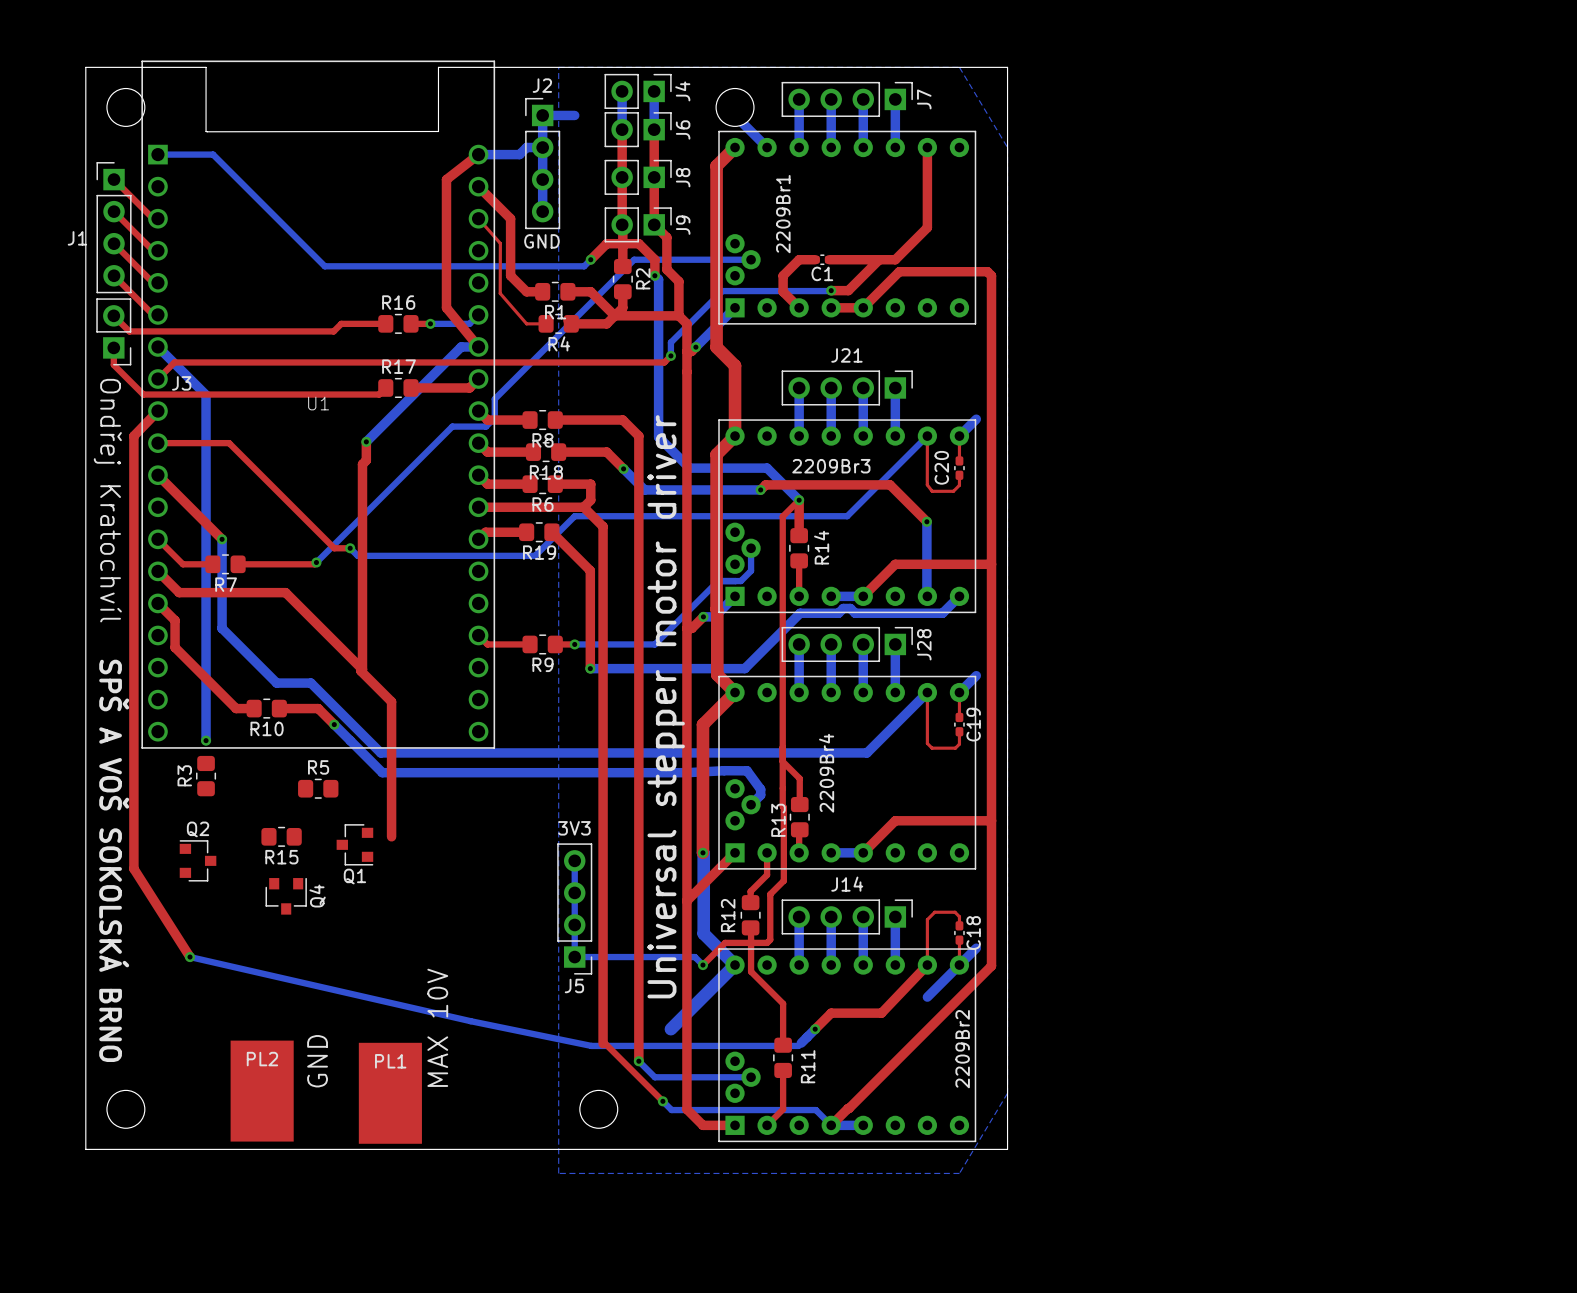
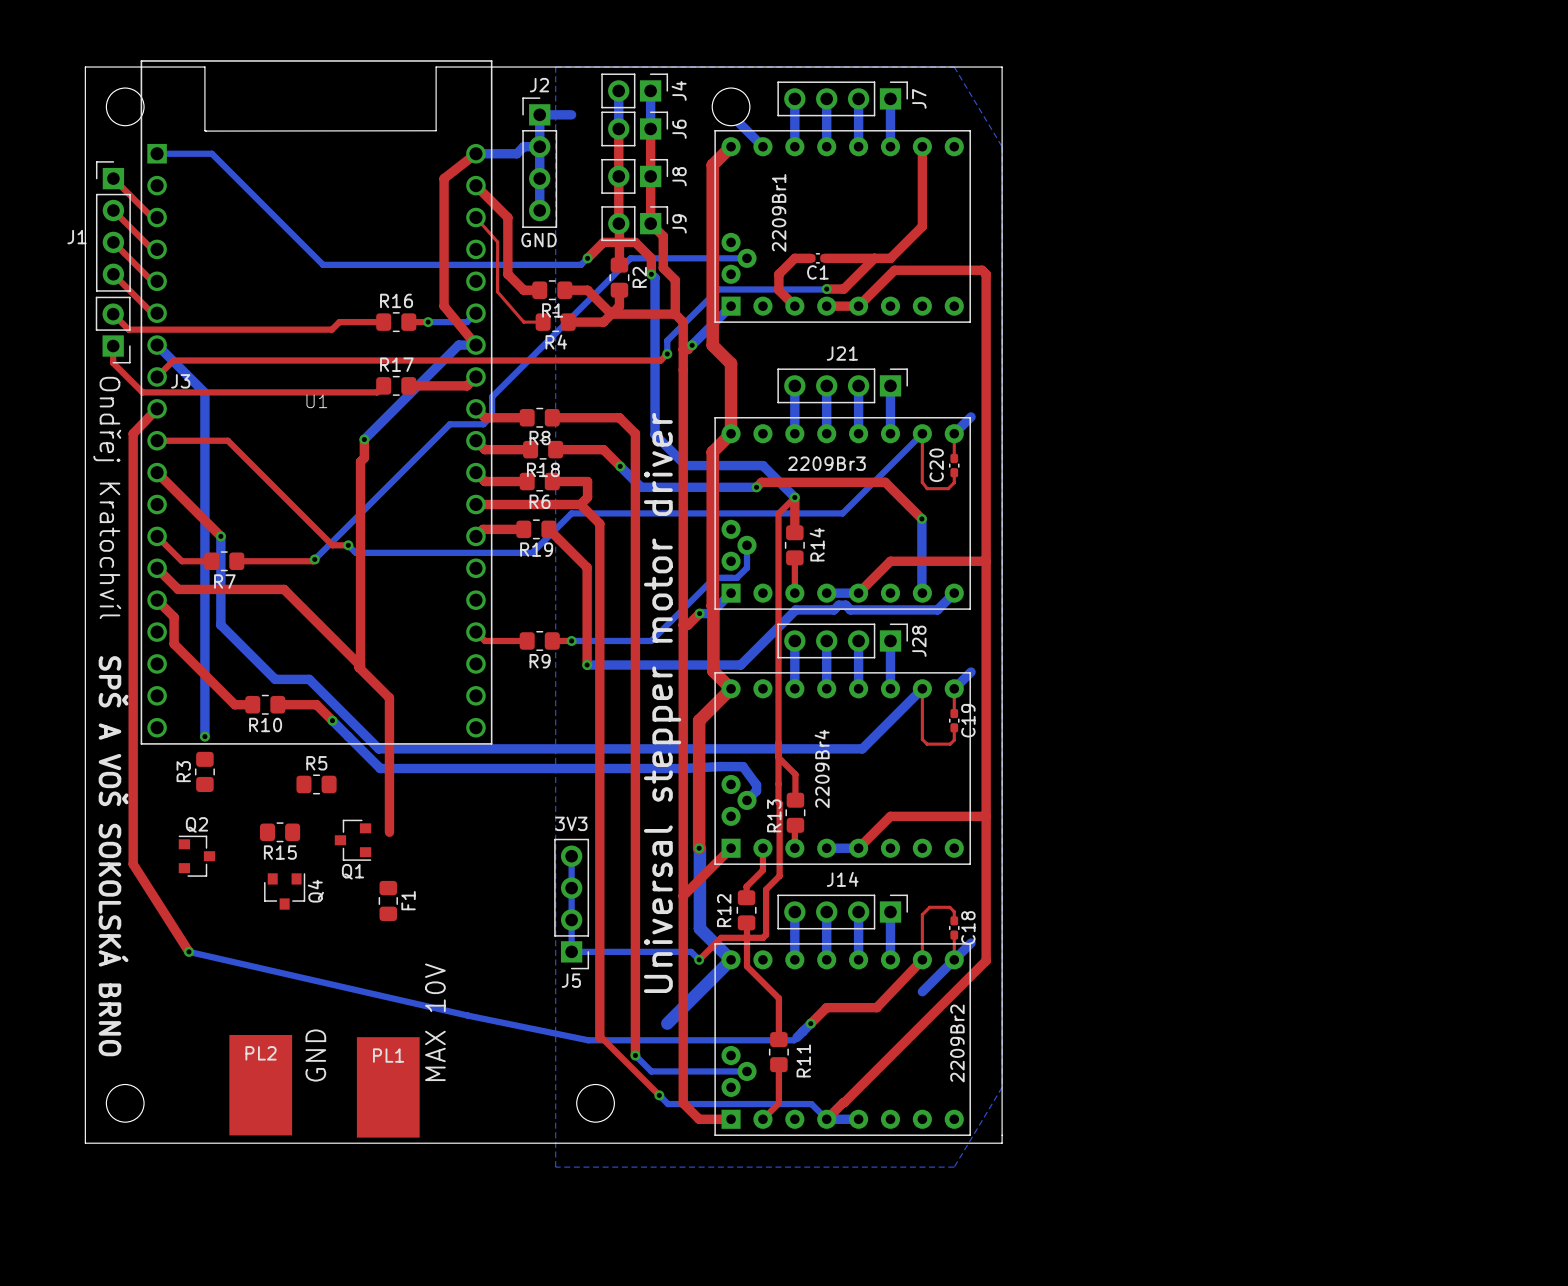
F1: none -> (388, 900)

